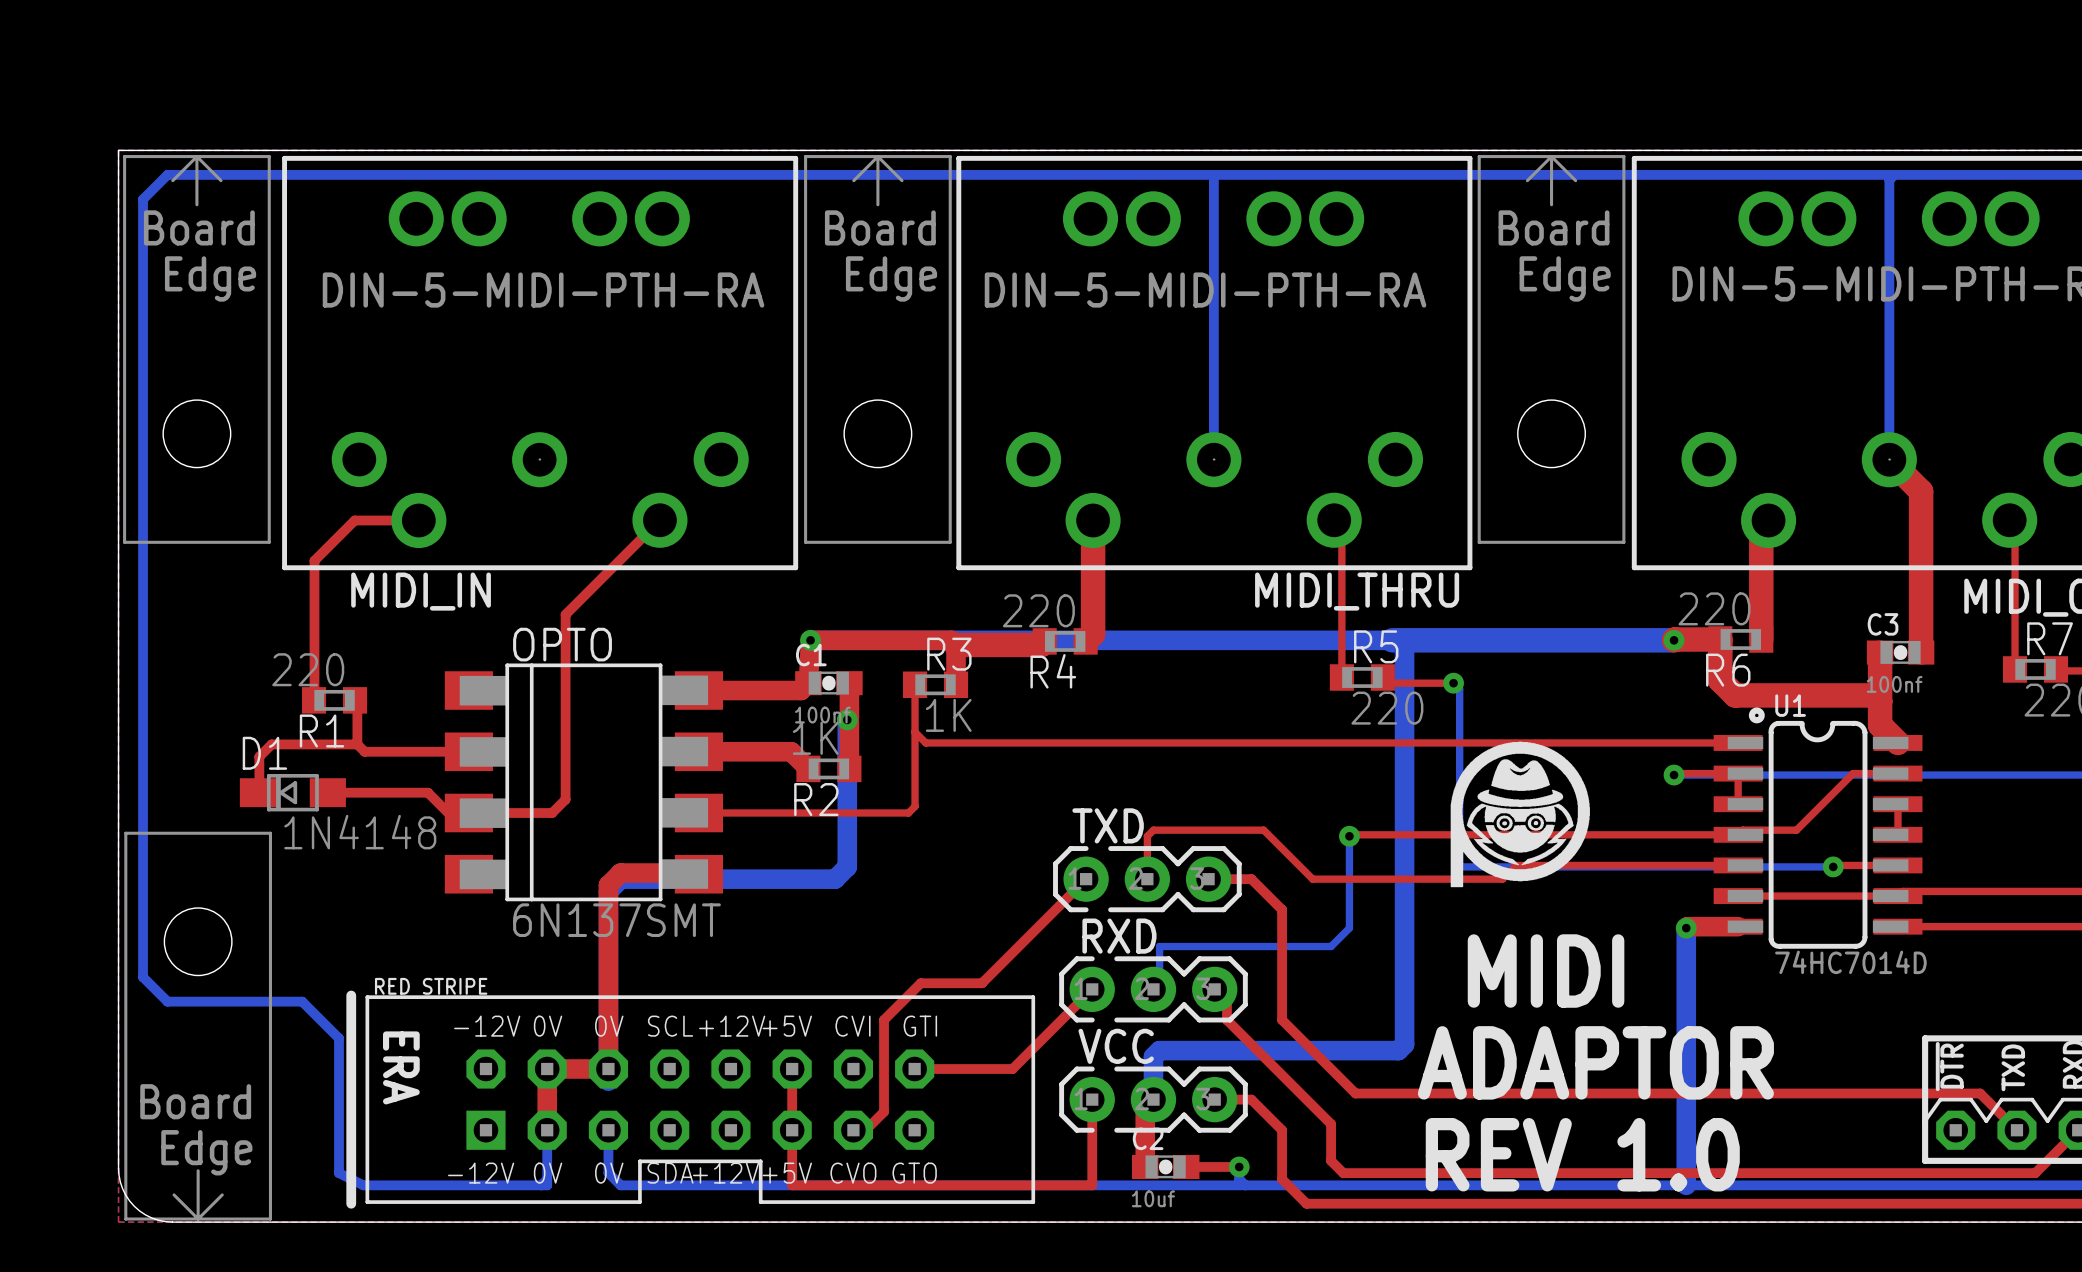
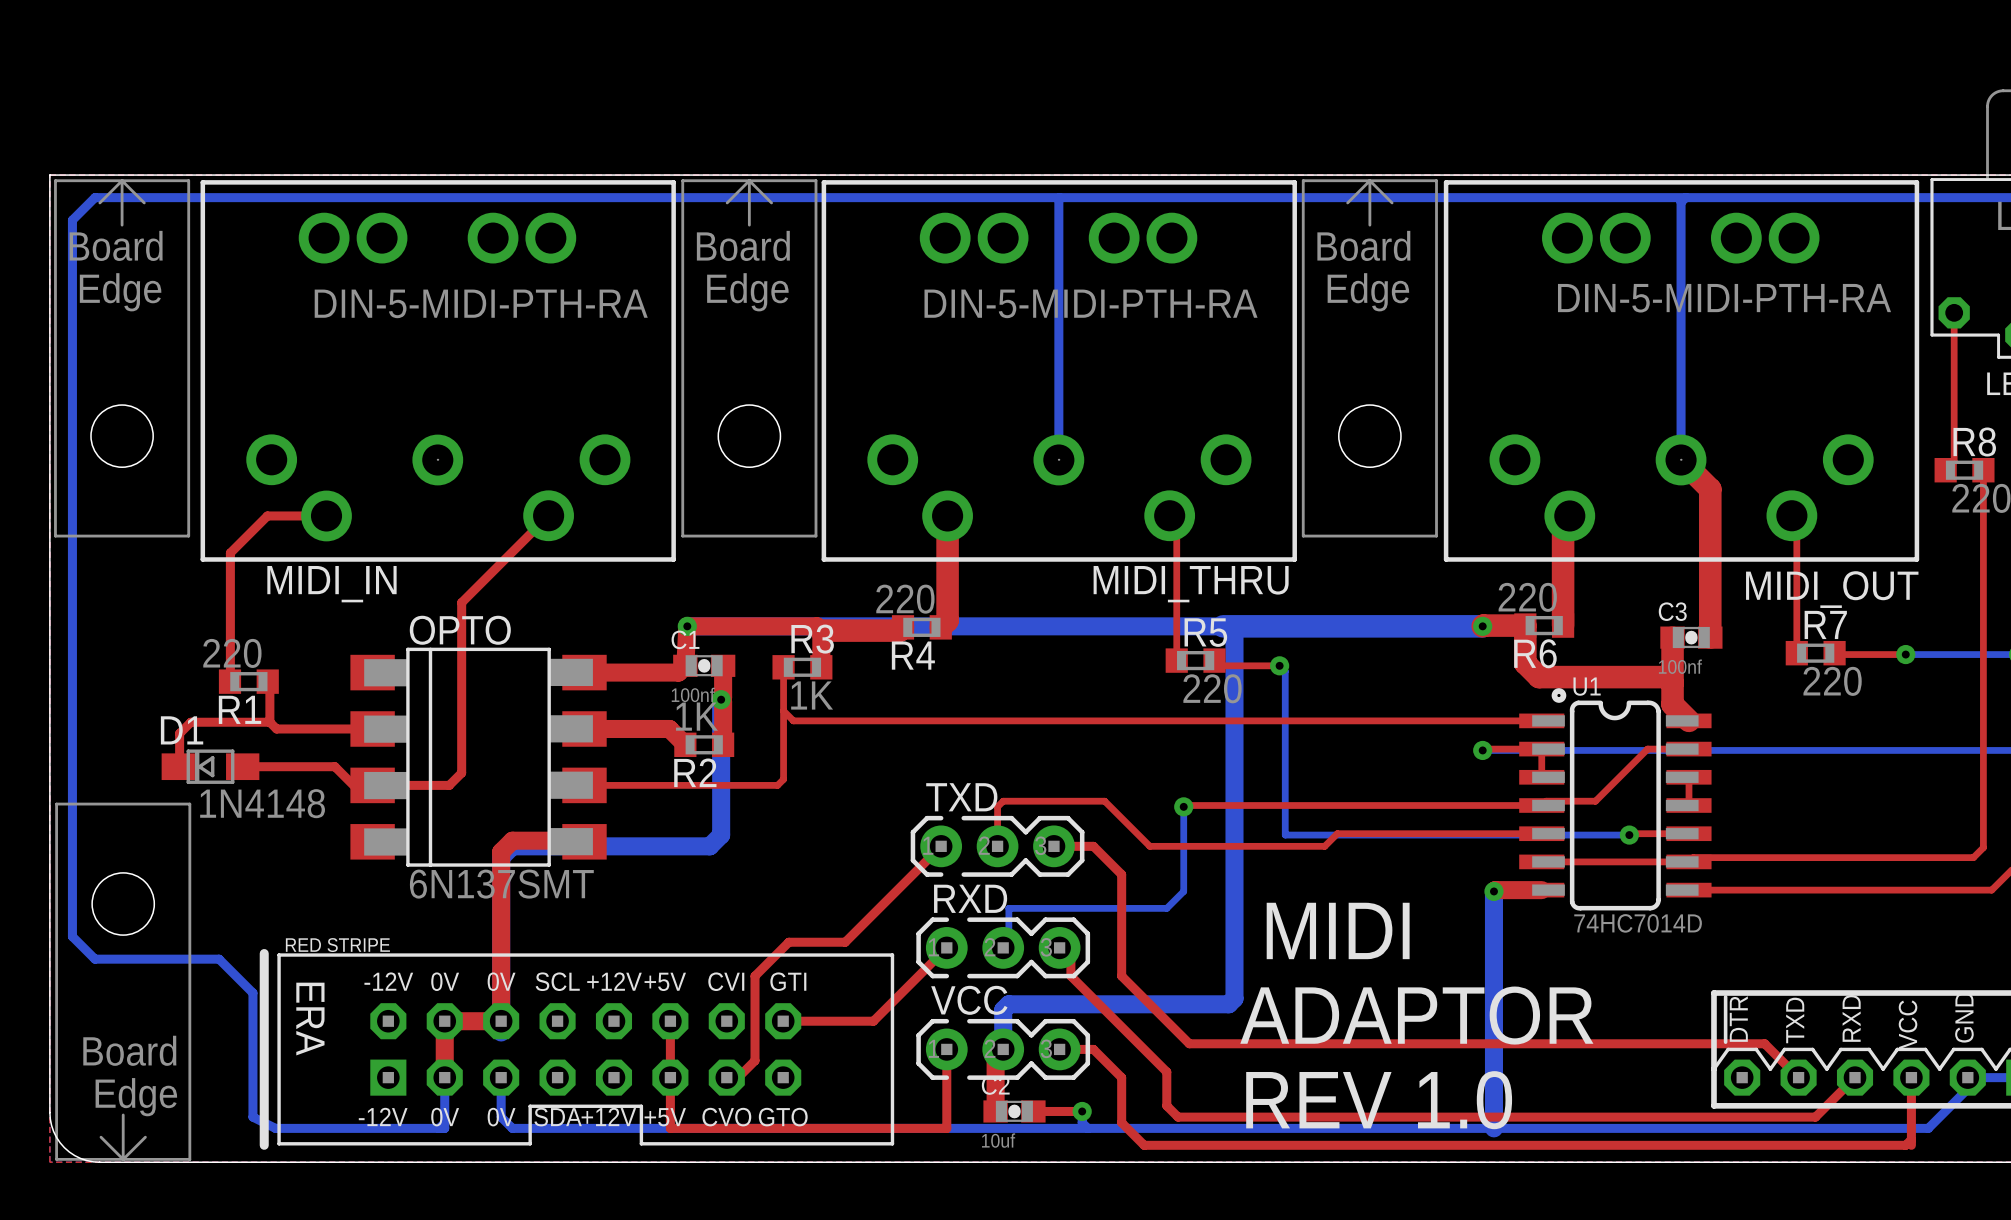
drawing: [1450, 741, 1590, 888] -> none

